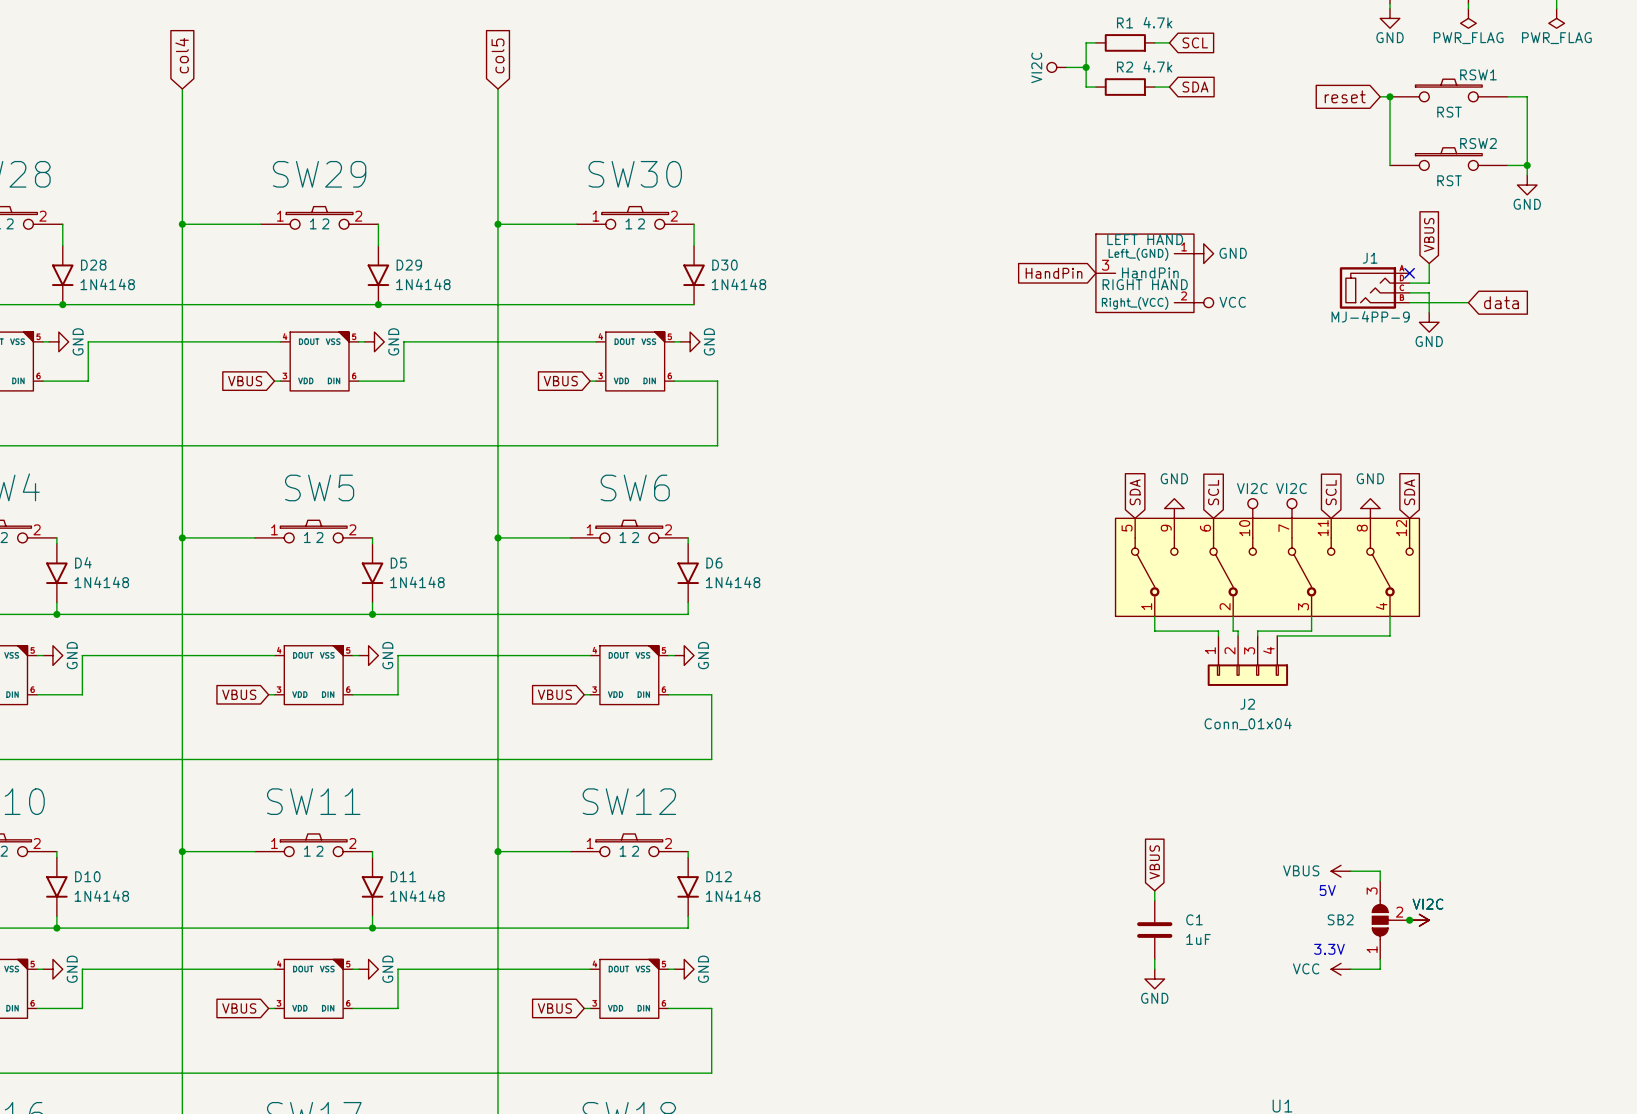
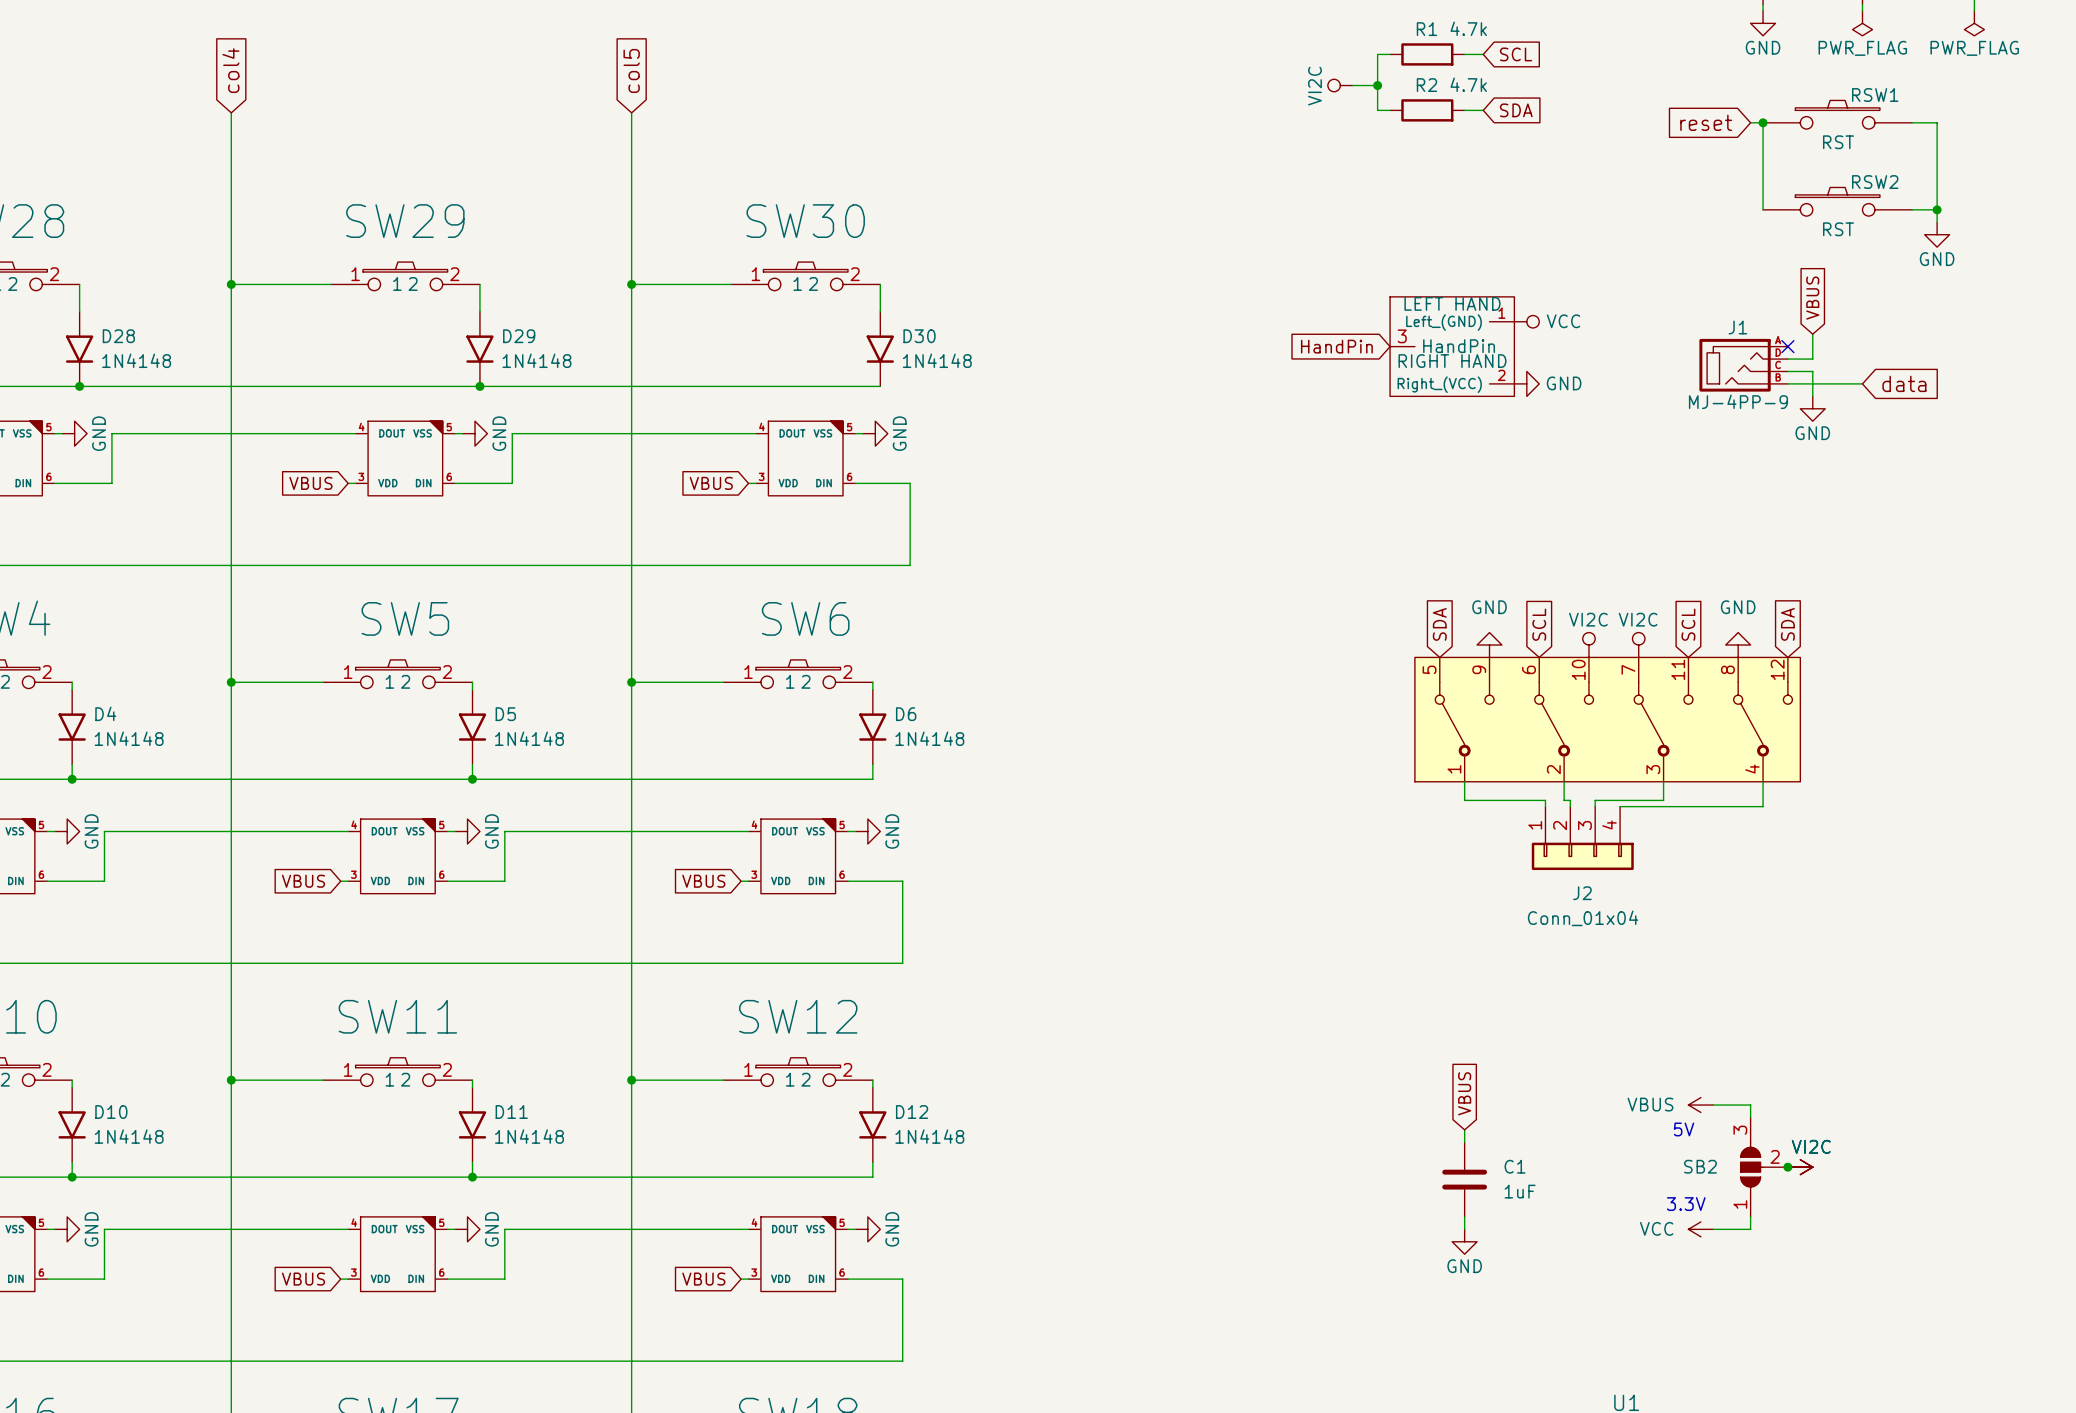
power symbol: GND (1203, 253) -> VCC (1526, 321)
power symbol: VCC (1203, 302) -> GND (1526, 383)

